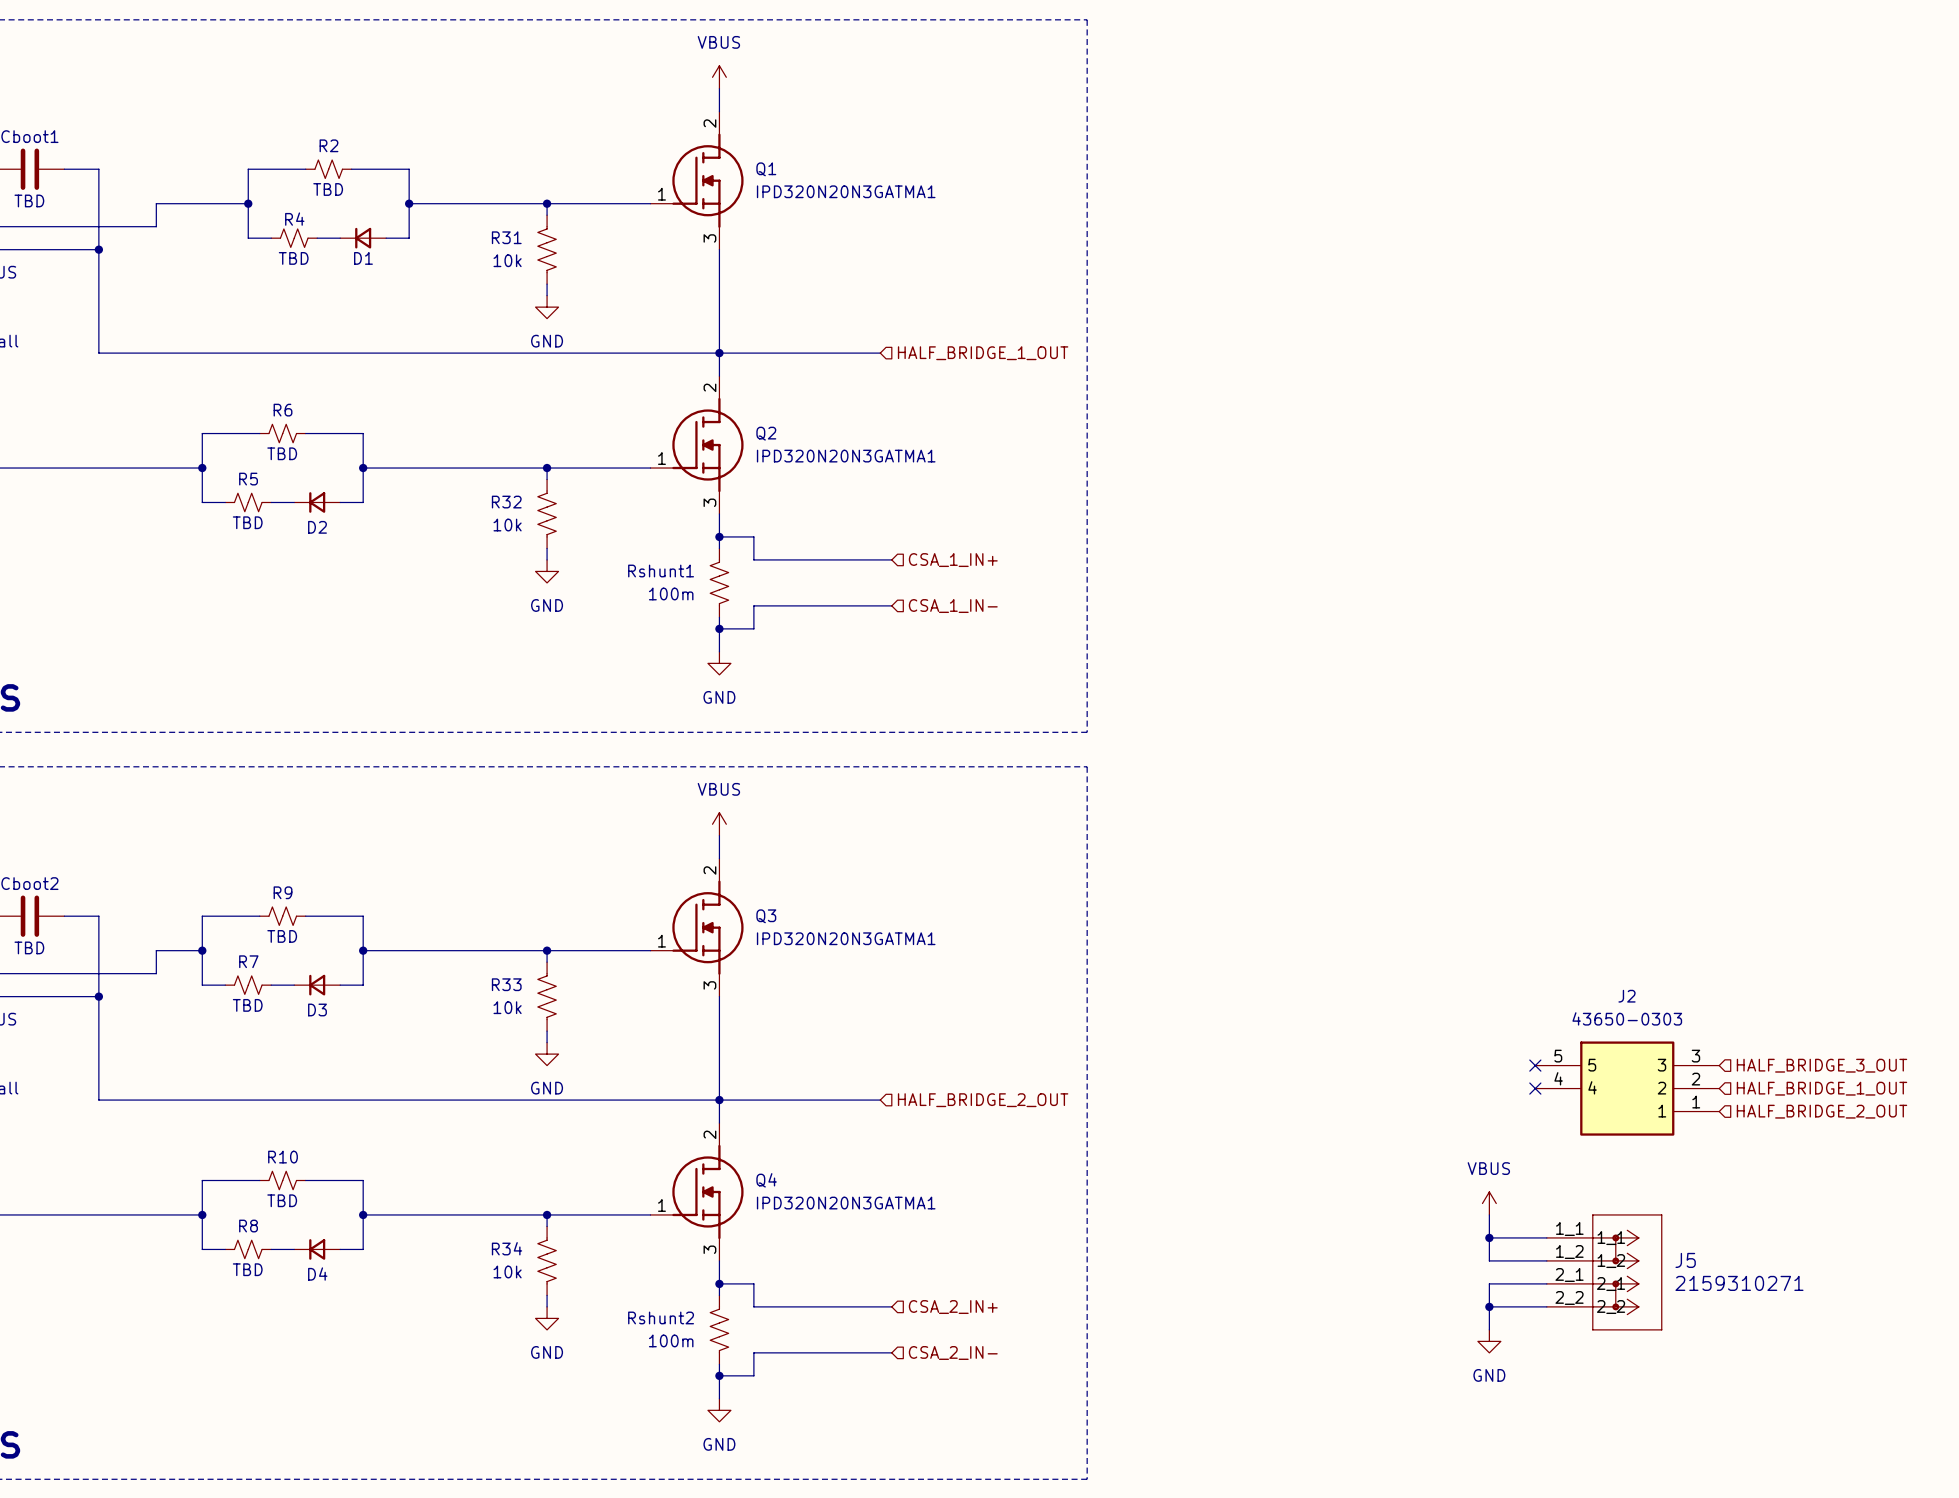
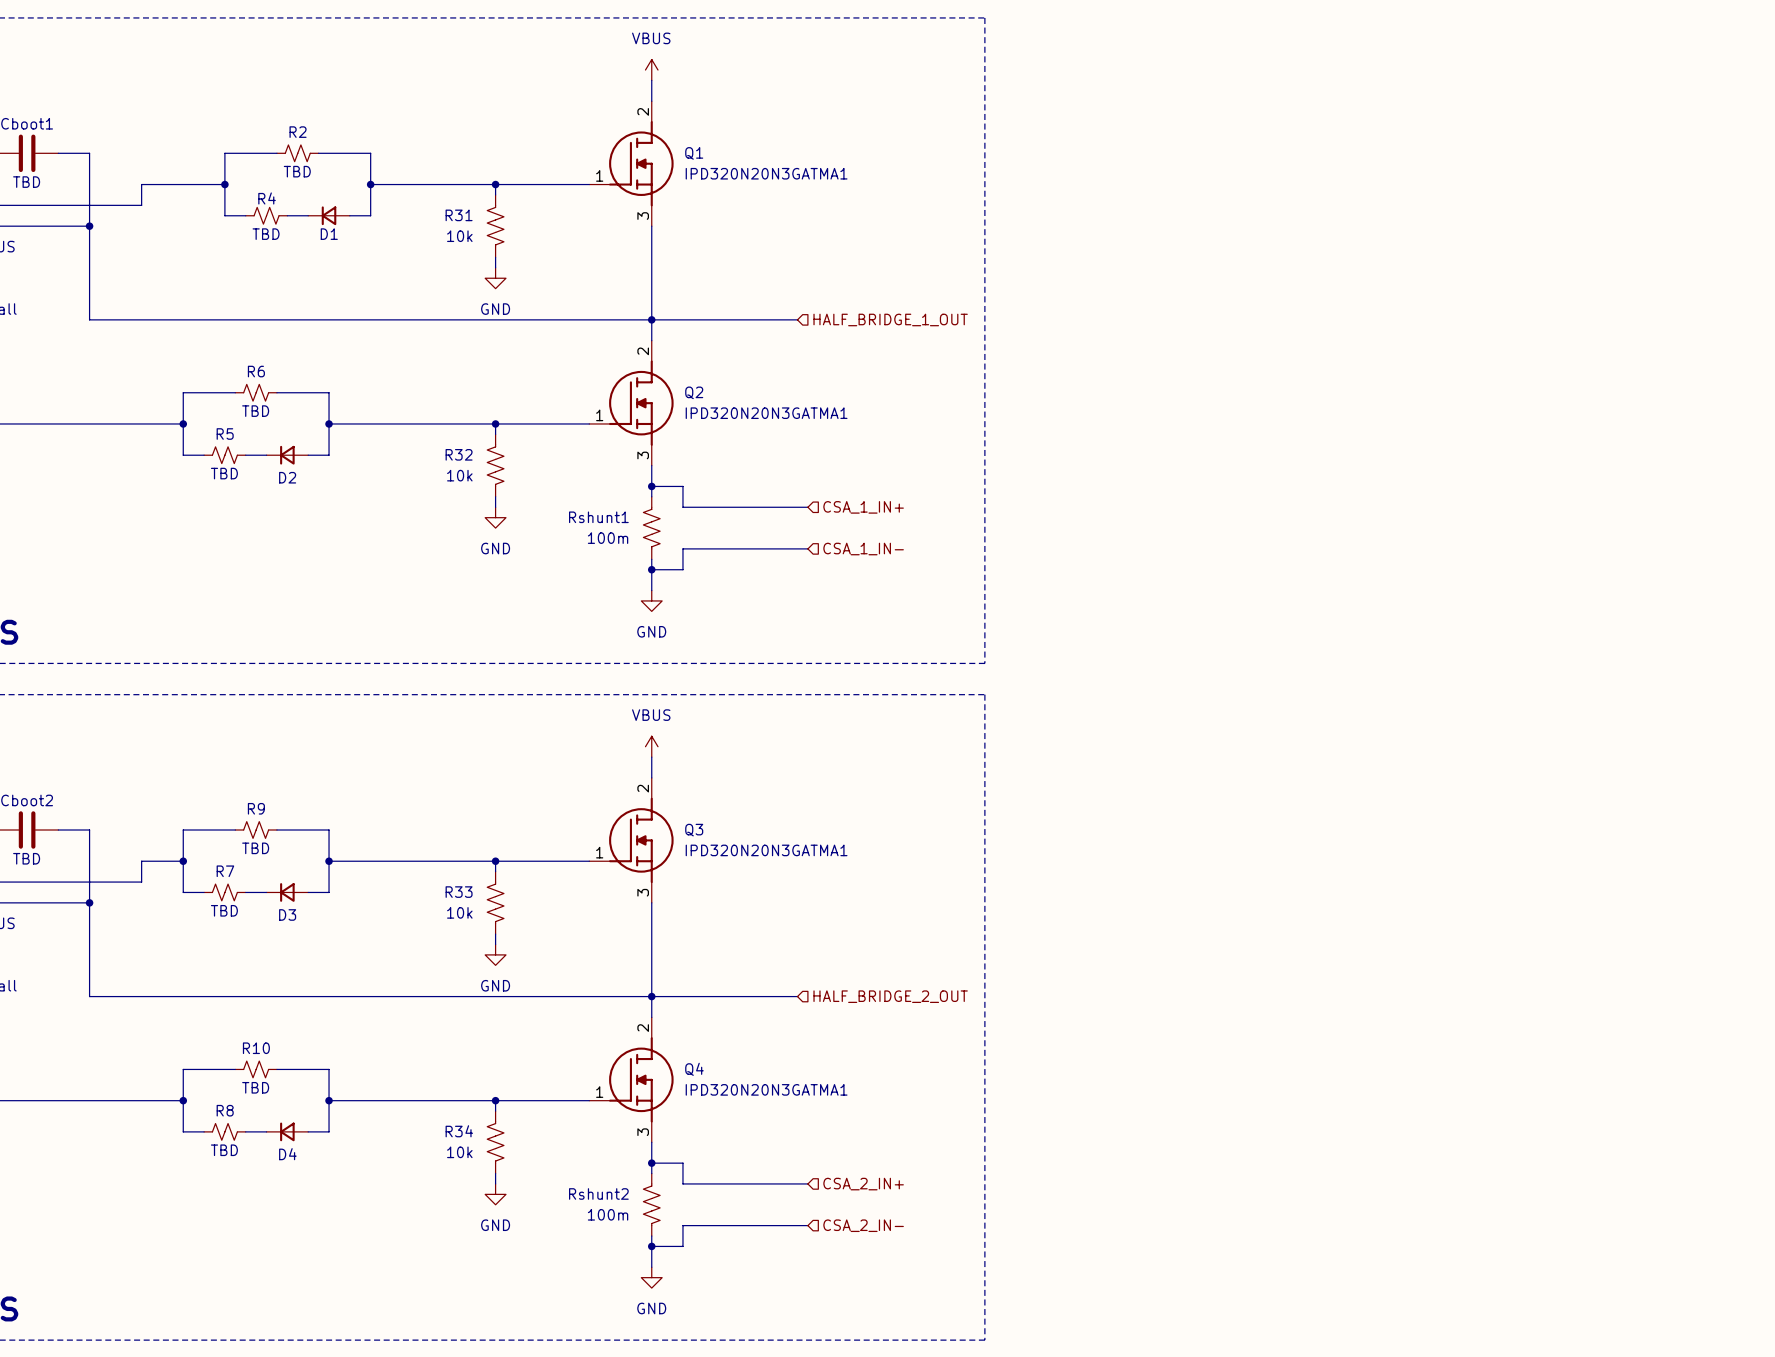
no-connect mark: (1535, 1065) -> none
hierarchical label: HALF_BRIDGE_3_OUT (1821, 1065) -> none
no-connect mark: (1535, 1088) -> none
J2: 43650-0303 (1627, 1088) -> none
hierarchical label: HALF_BRIDGE_1_OUT (1821, 1088) -> none
hierarchical label: HALF_BRIDGE_2_OUT (1821, 1111) -> none
power symbol: VBUS (1489, 1203) -> none
wire: (1489, 1214) (1489, 1260) (1546, 1260) -> none
wire: (1489, 1237) (1546, 1237) -> none
junction: (1489, 1237) -> none
J5: 2159310271 (1604, 1272) -> none
wire: (1546, 1283) (1489, 1283) (1489, 1329) -> none
wire: (1489, 1306) (1546, 1306) -> none
junction: (1489, 1306) -> none
power symbol: GND (1489, 1341) -> none

